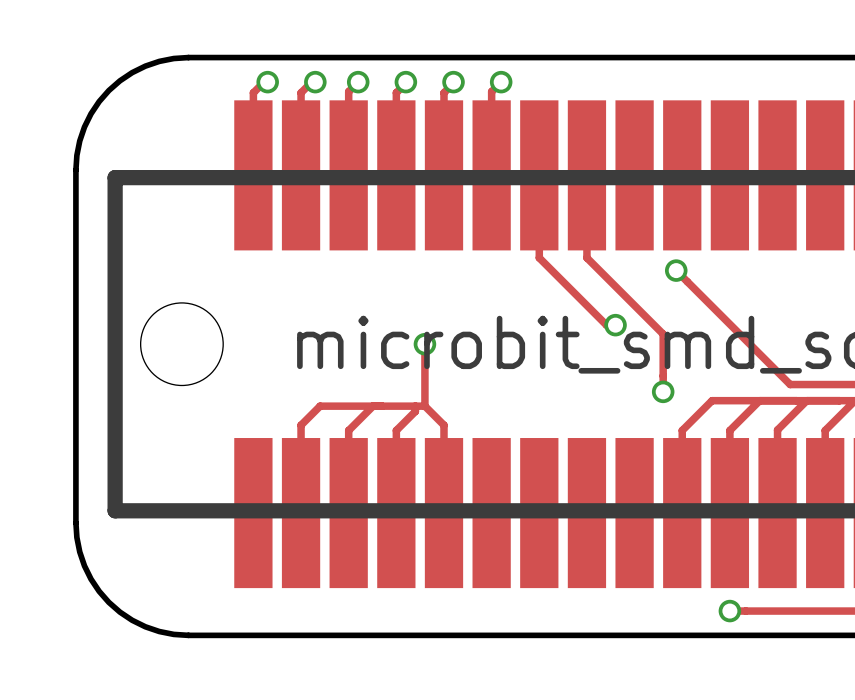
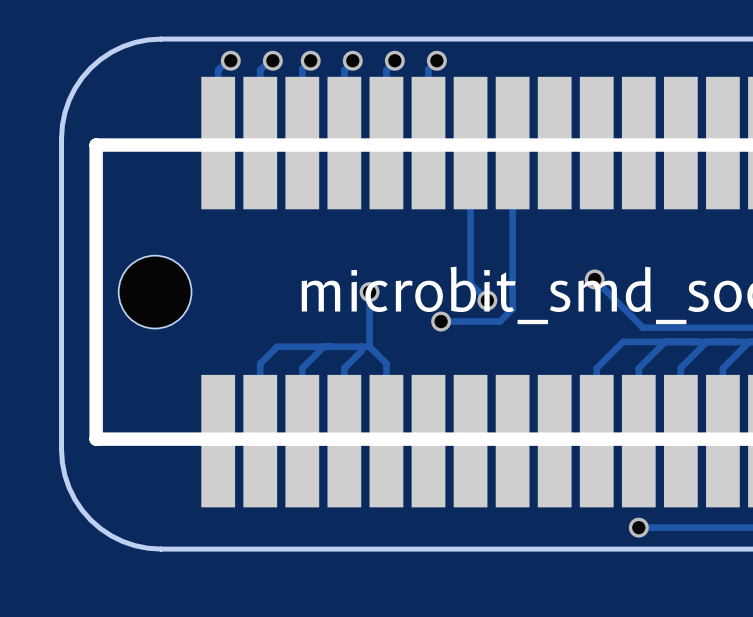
track: (539, 257) (606, 325) (615, 325) -> (470, 215) (470, 283) (487, 300)
track: (586, 257) (663, 334) (663, 391) -> (512, 215) (512, 308) (499, 321) (441, 321)
track: (676, 270) (790, 384) -> (594, 279) (642, 327) (692, 327)
via: (676, 270) -> none
via: (615, 325) -> none
via: none -> (594, 279)
via: none -> (487, 300)
via: none -> (441, 321)
via: (663, 391) -> none

